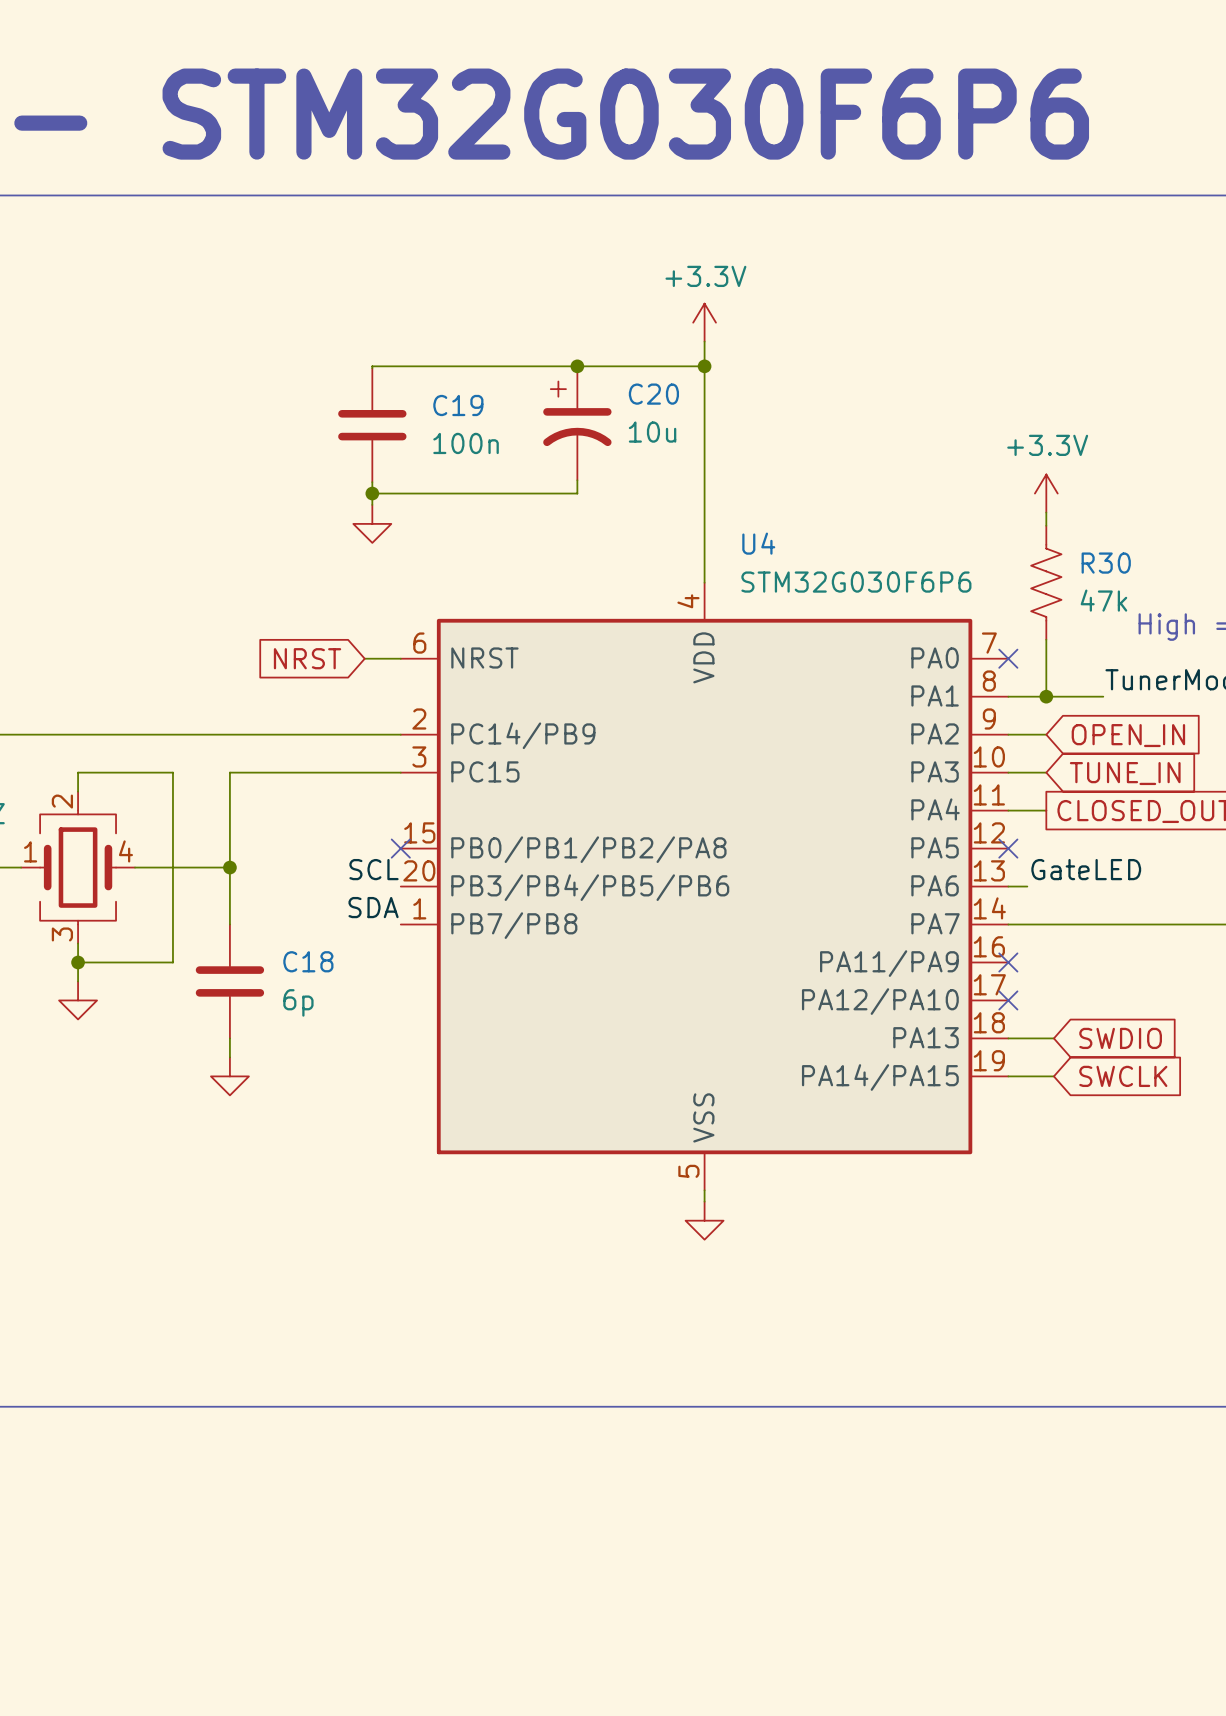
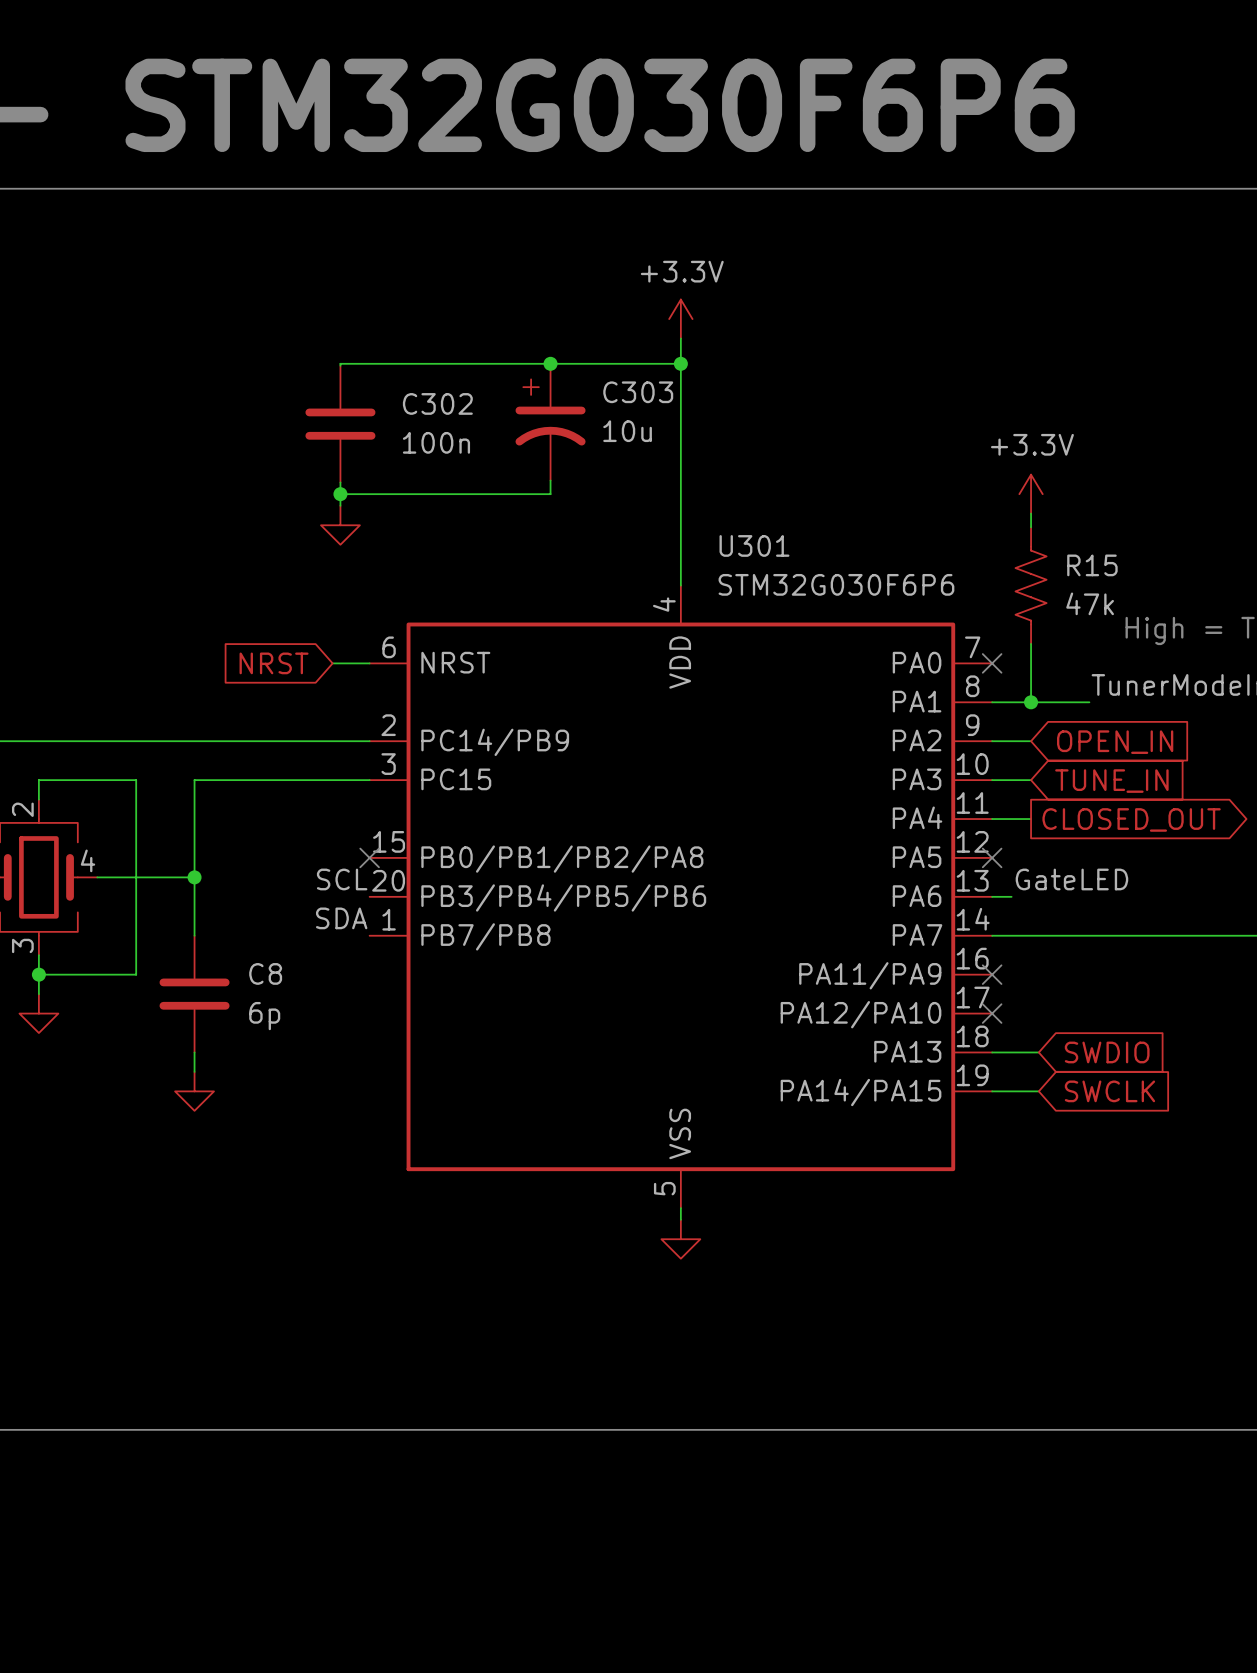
C20 name: C20 (653, 394) -> C303 (638, 392)
C19 name: C19 (458, 405) -> C302 (437, 403)
U4 name: U4 (758, 543) -> U301 (754, 545)
R30 name: R30 (1106, 563) -> R15 (1092, 565)
C18 name: C18 (308, 961) -> C8 (265, 973)

